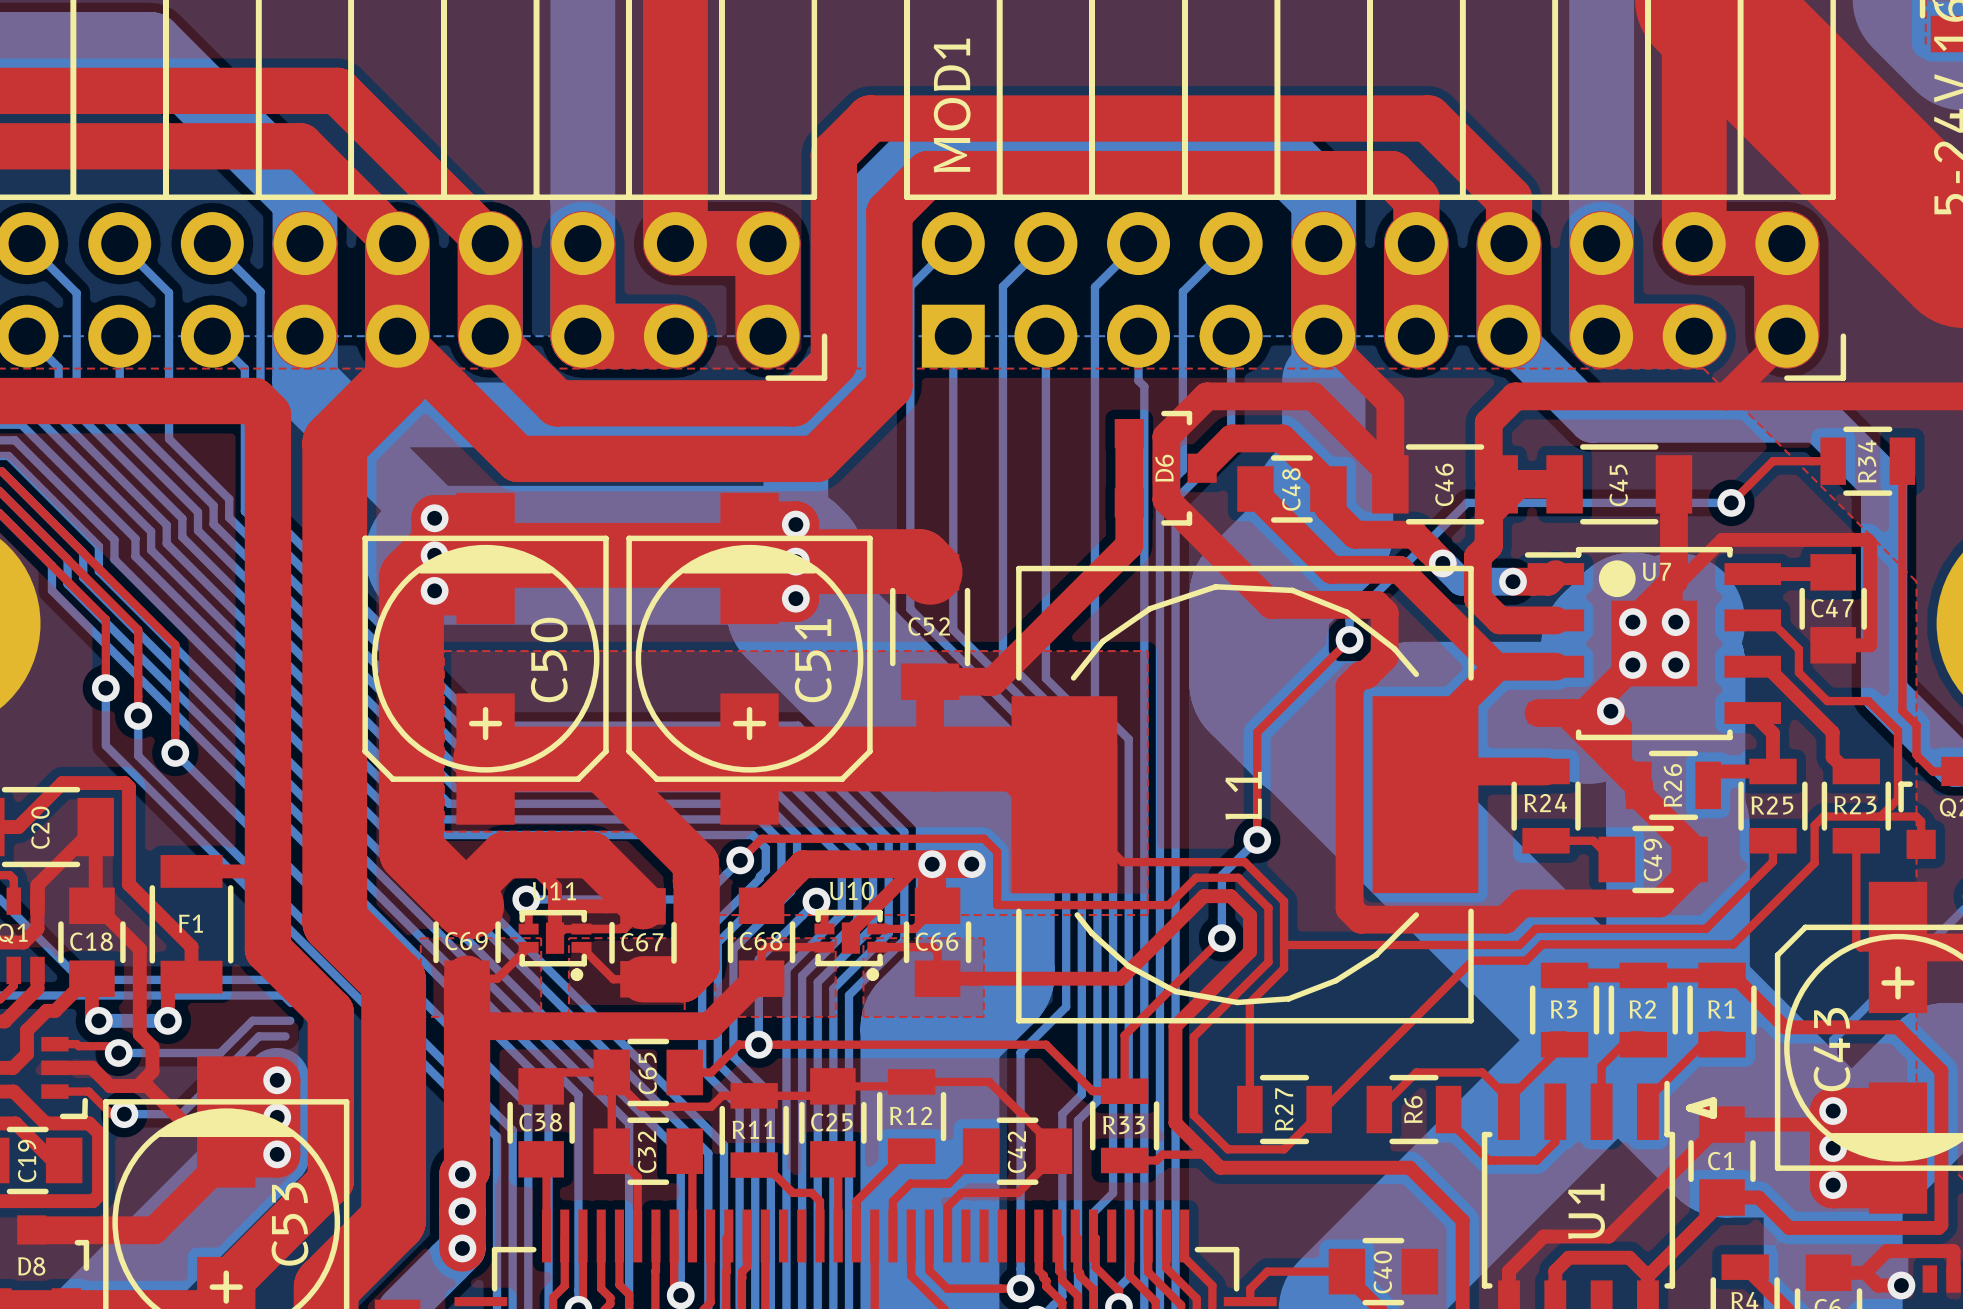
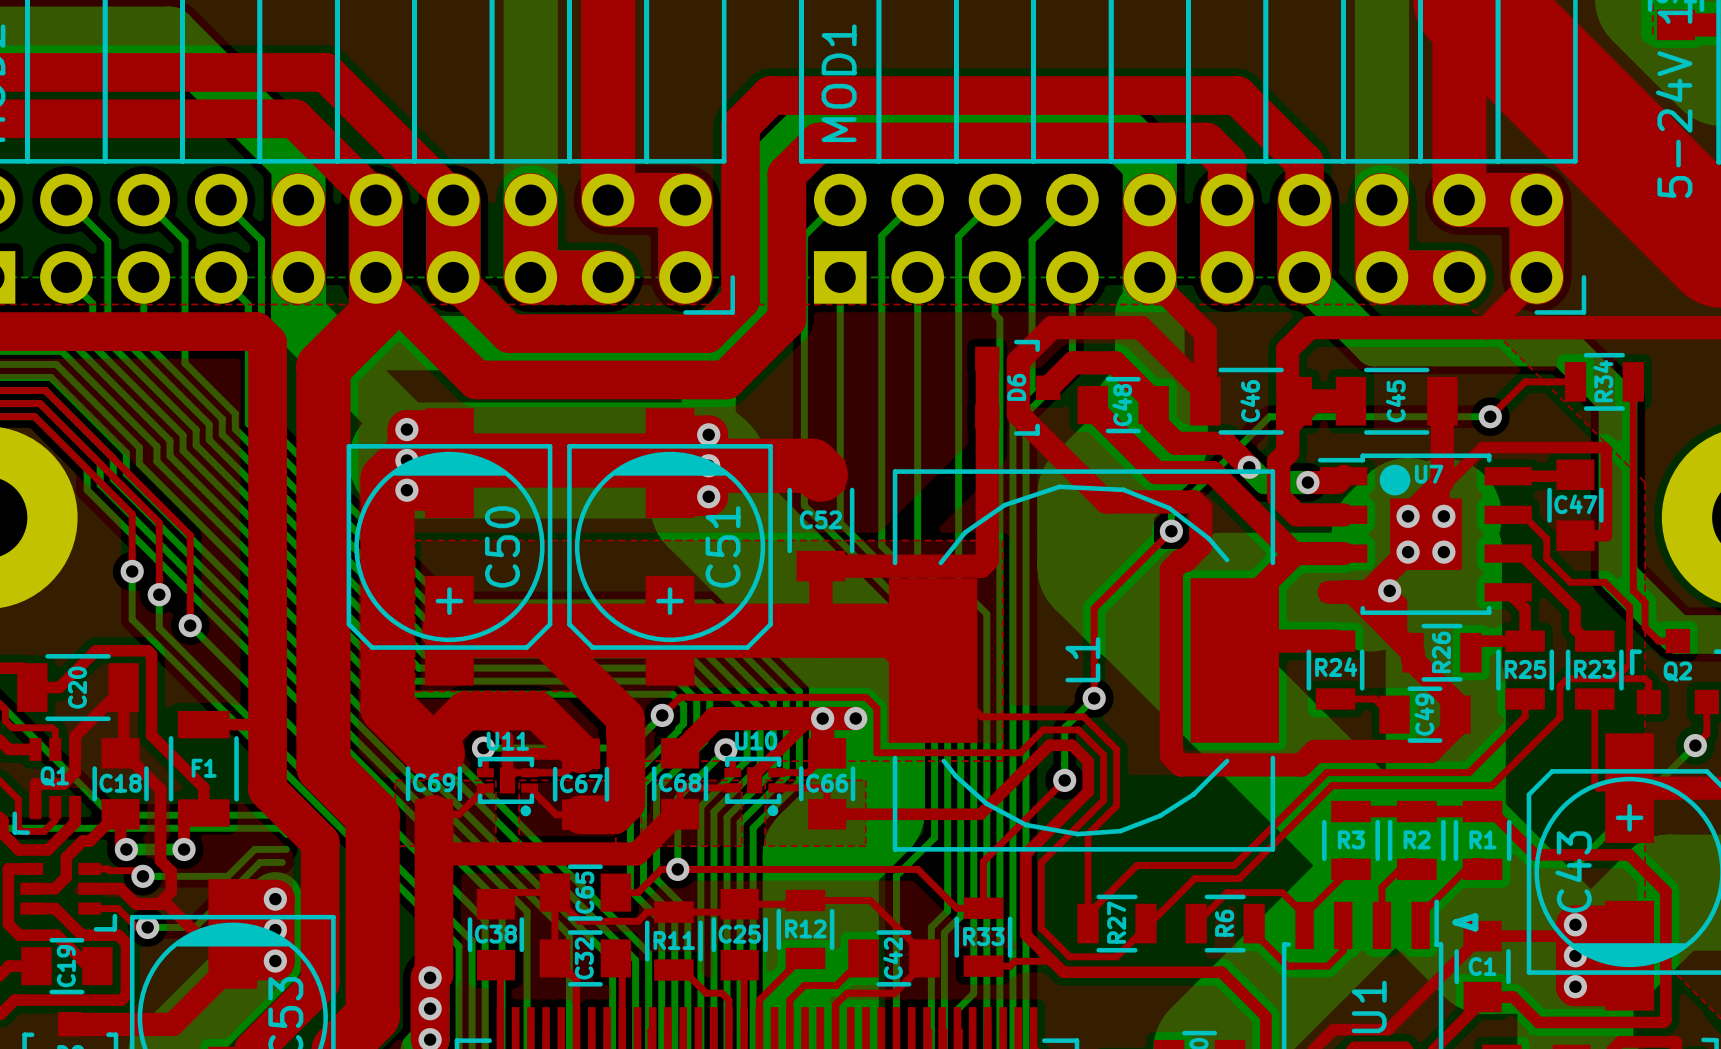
top track: (1129, 545) (992, 681) -> (987, 452) (987, 559) (981, 566) (873, 566)
top track: (1284, 942) (1286, 945) (1519, 945) -> (1088, 914) (1136, 865) (1233, 865) (1313, 786)
top track: (1525, 960) (1472, 960) (1377, 1055) -> (1318, 799) (1239, 878) (1194, 878)

